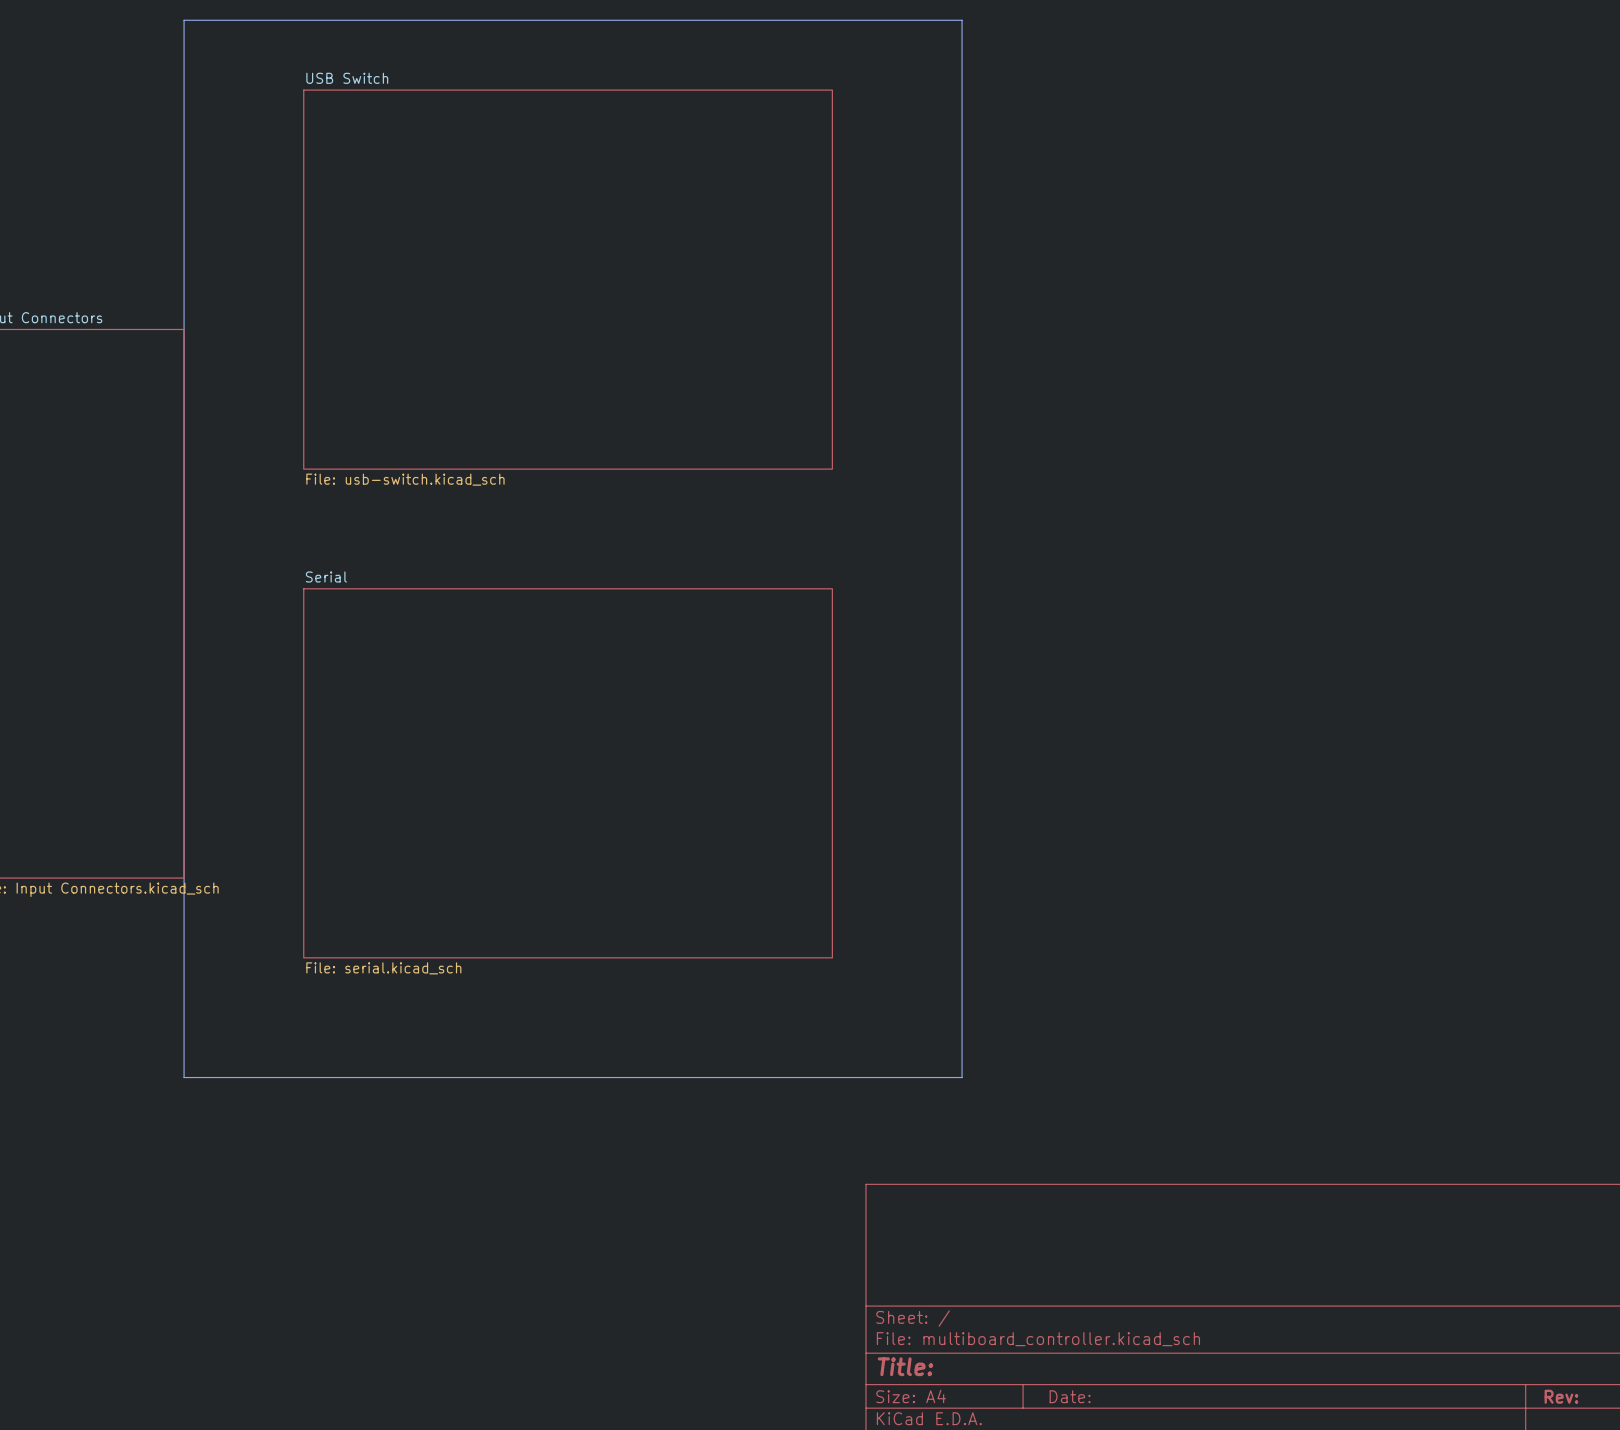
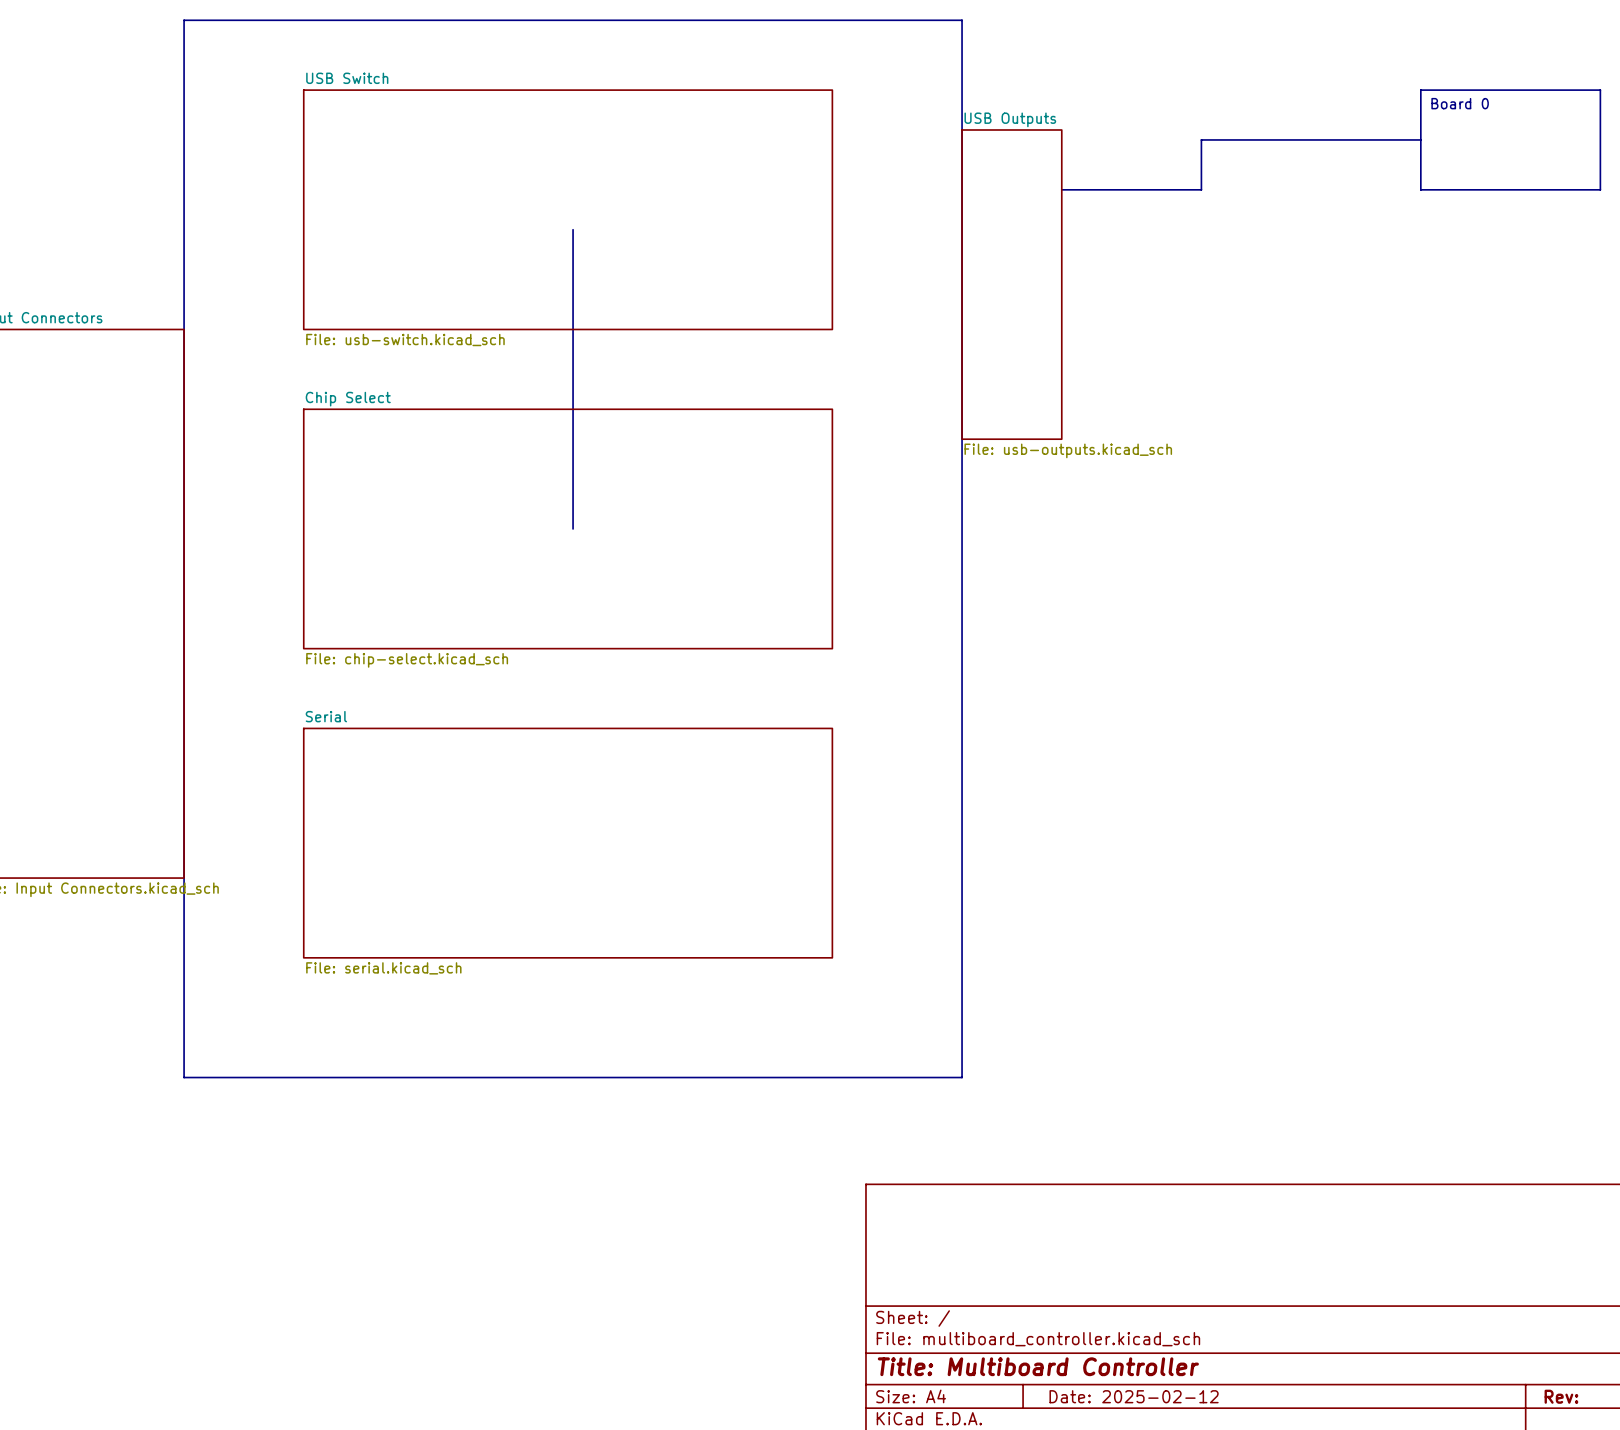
line: none -> (1420, 90) (1600, 90) (1600, 189) (1420, 189) (1420, 90)
text: none -> Board 0 (1460, 103)
line: none -> (1420, 139) (1201, 139) (1201, 189) (1061, 189)
sheet USB Switch: none -> File: usb-switch.kicad_sch (568, 209)
line: none -> (573, 229) (573, 528)
sheet USB Switch: File: usb-switch.kicad_sch (568, 279) -> none
sheet USB Outputs: none -> File: usb-outputs.kicad_sch (1011, 284)
sheet Chip Select: none -> File: chip-select.kicad_sch (568, 528)
sheet Serial: File: serial.kicad_sch (568, 773) -> none
sheet Serial: none -> File: serial.kicad_sch (568, 843)
title block: Title: (905, 1366) -> Title: Multiboard Controller (1038, 1366)
title block: Date: (1070, 1396) -> Date: 2025-02-12 (1134, 1396)

